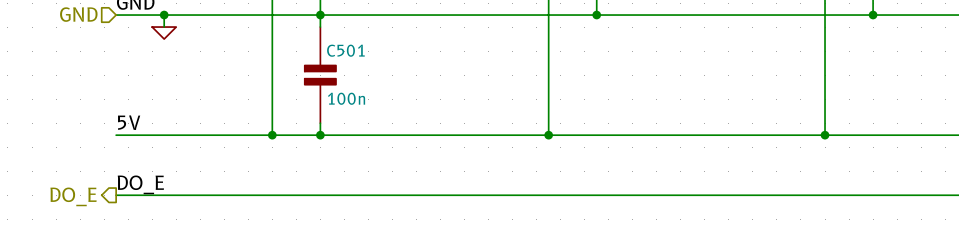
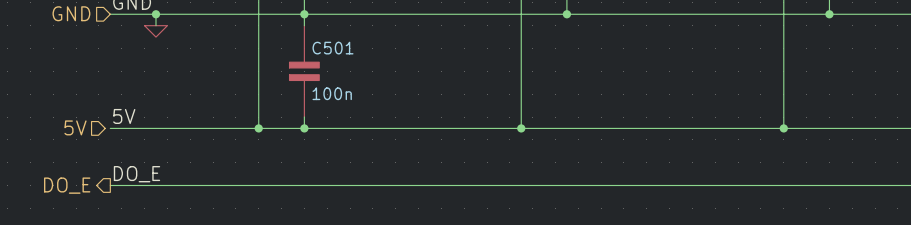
hierarchical label: none -> 5V (75, 127)

